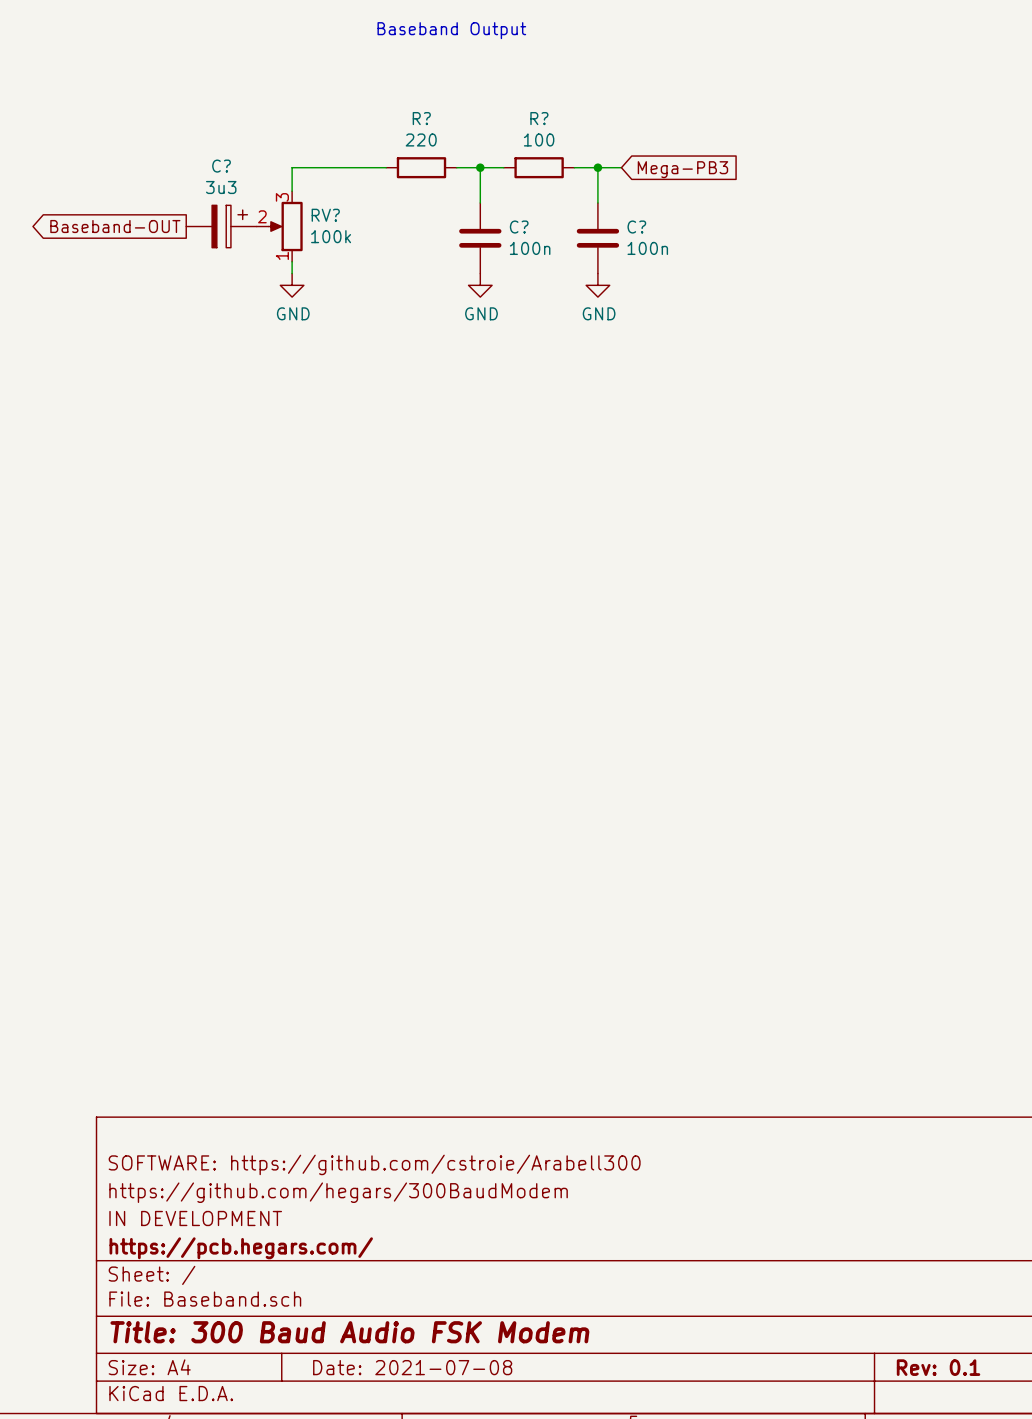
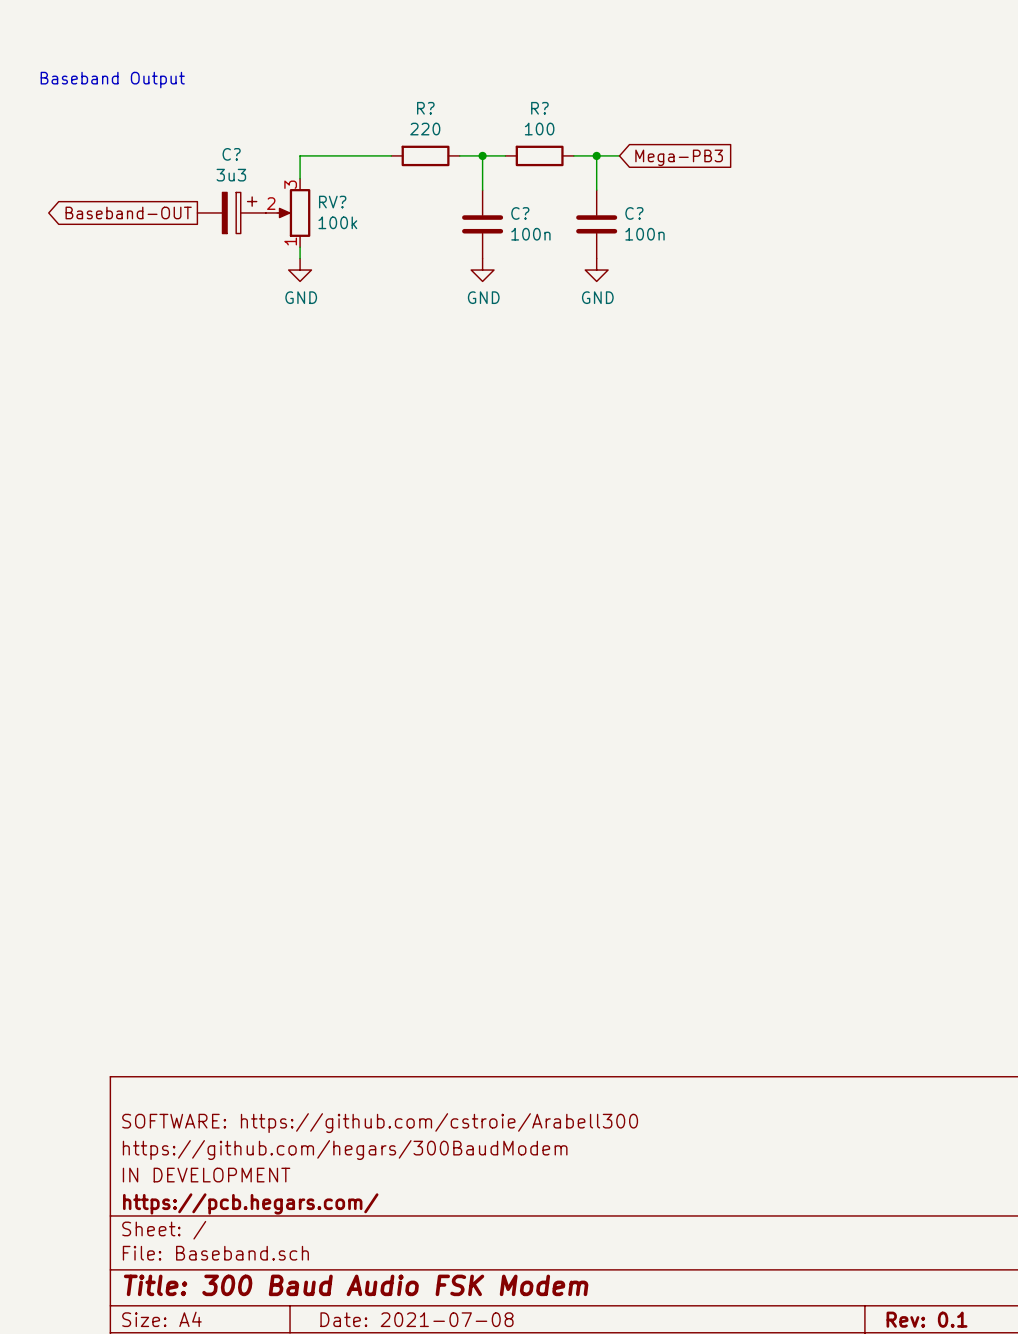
text: Baseband Output (451, 30) -> none
text: none -> Baseband Output (112, 80)

